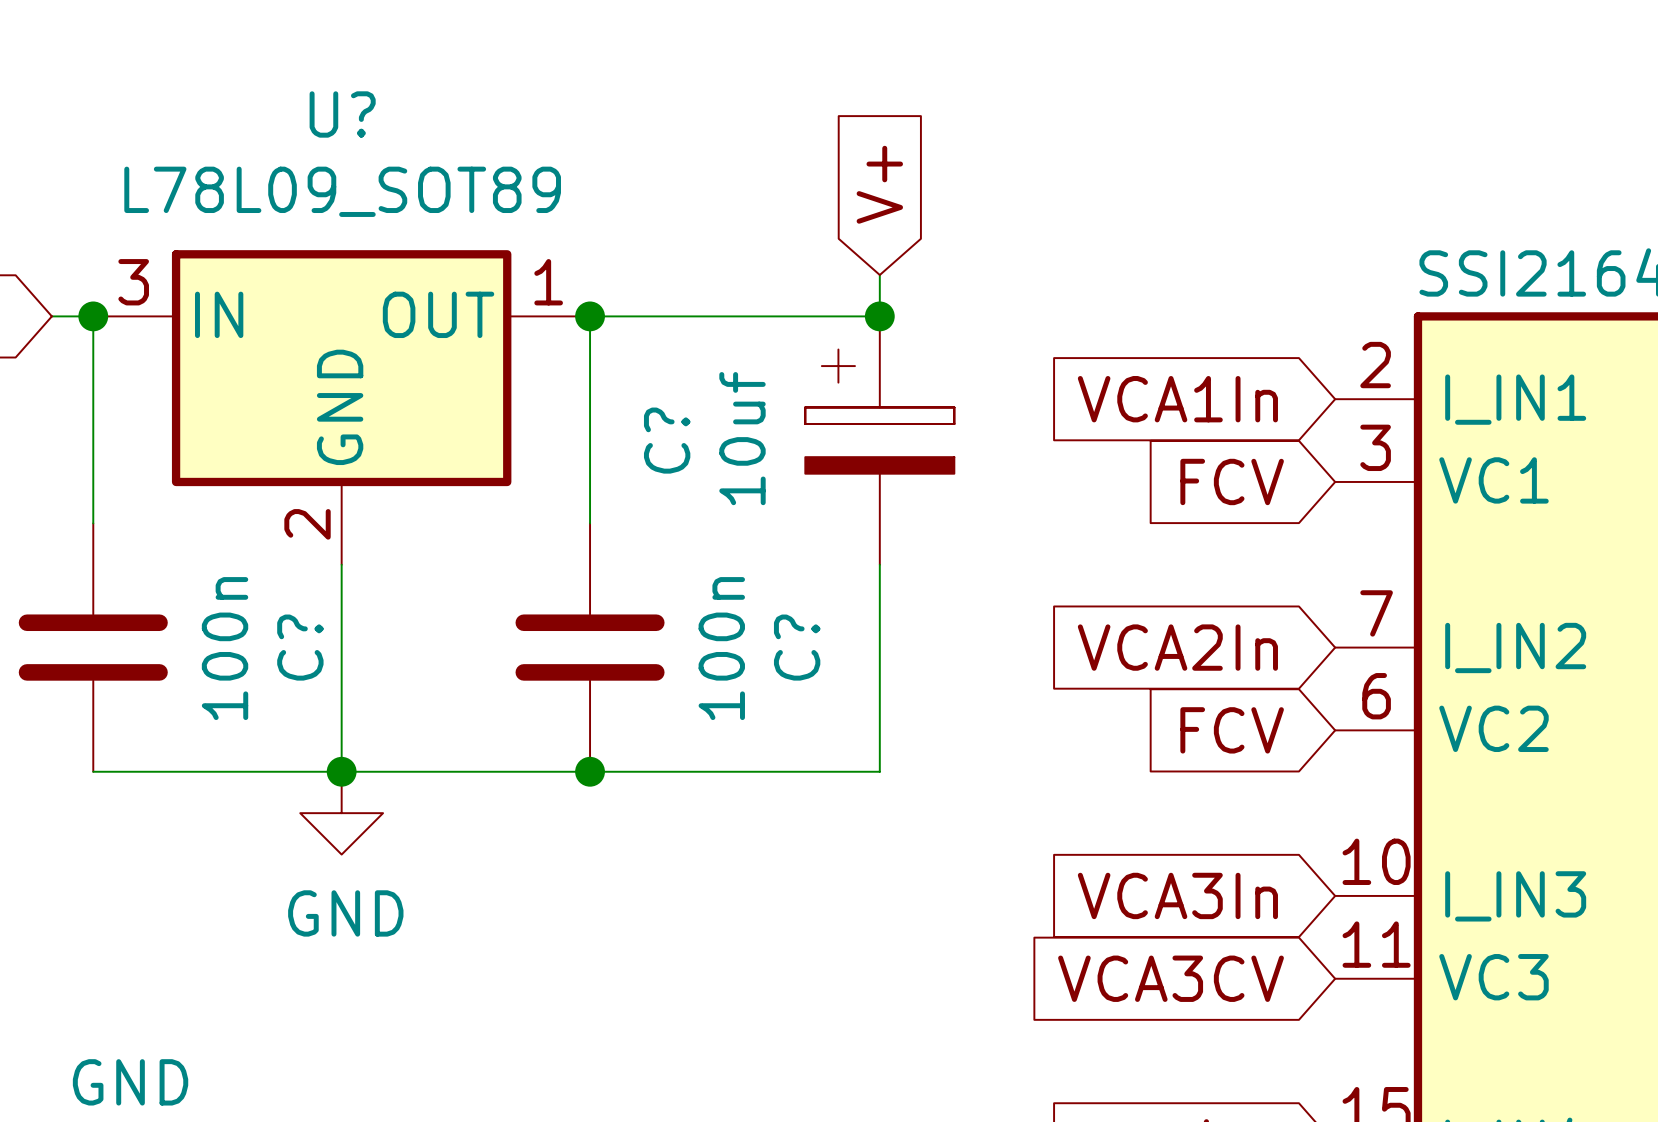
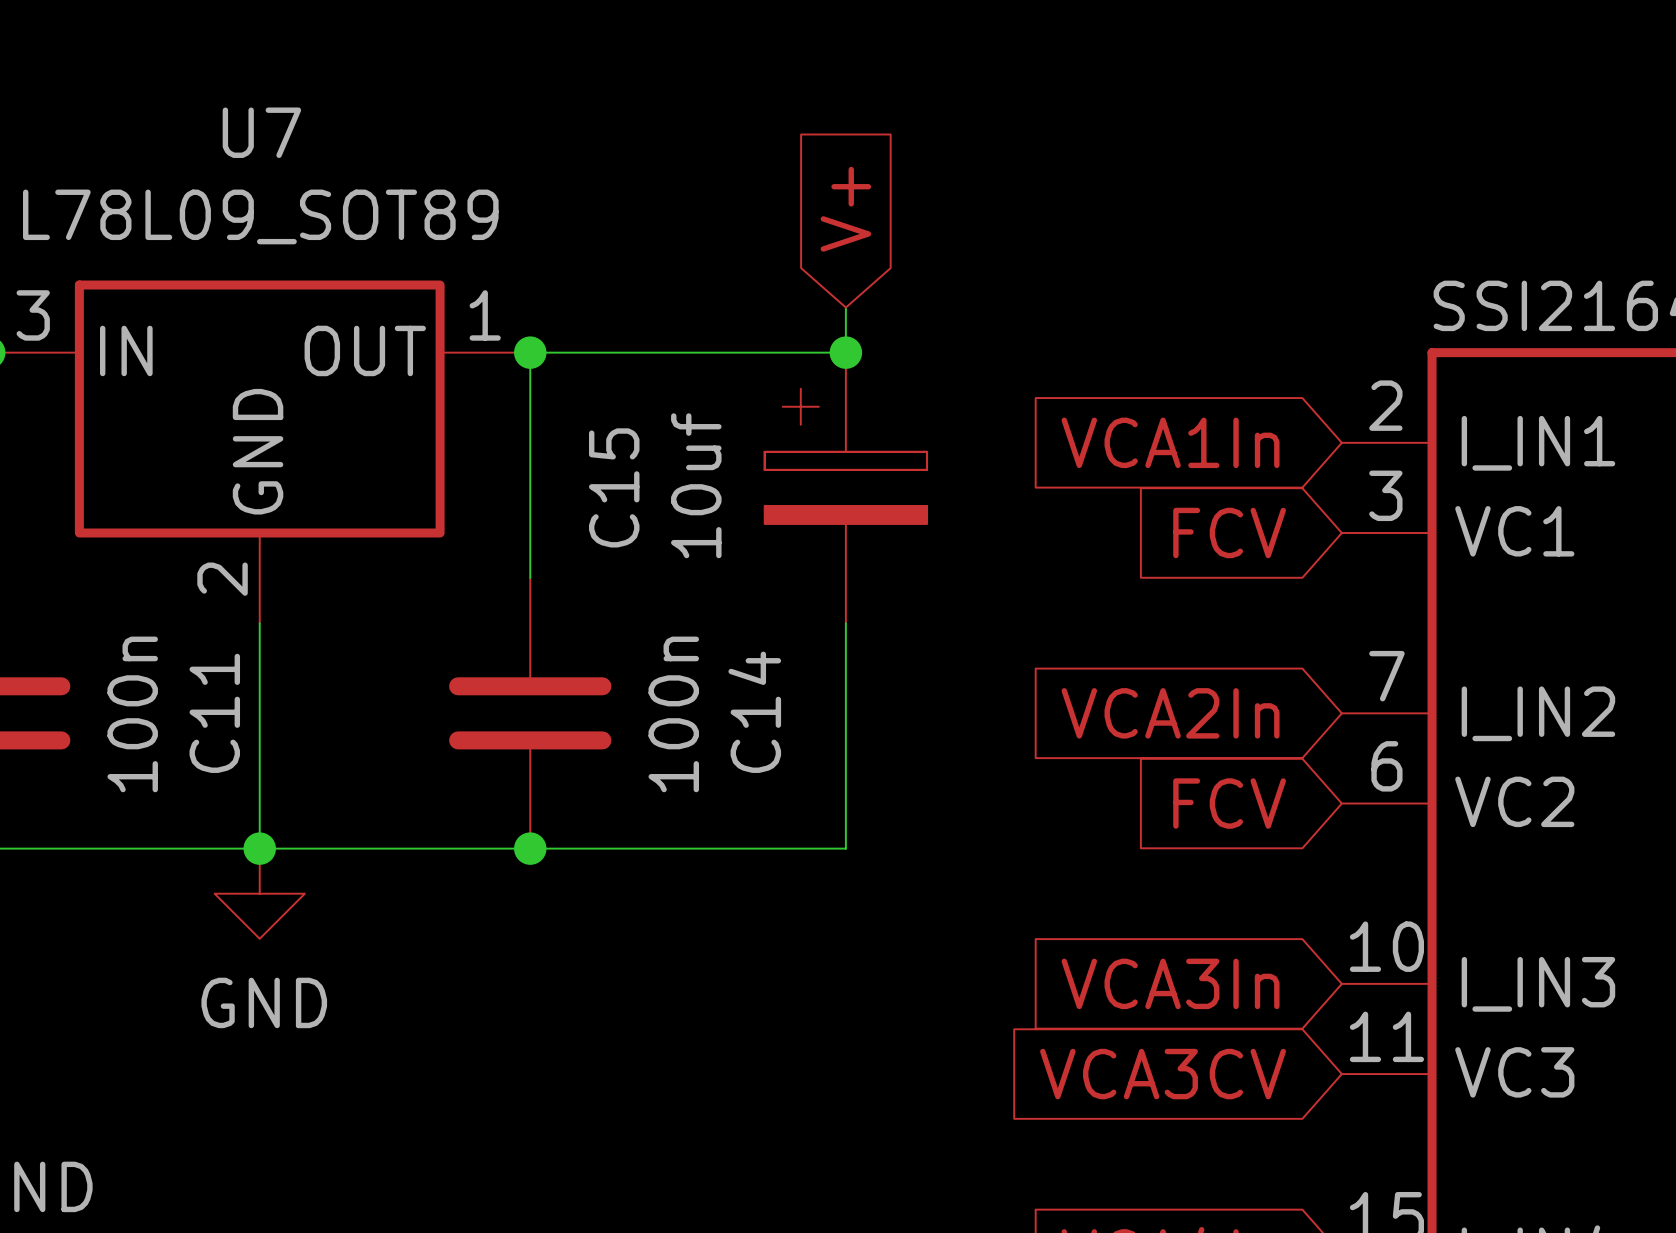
U? name: U? (342, 114) -> U7 (261, 132)
C? name: C? (667, 440) -> C15 (614, 487)
C? name: C? (300, 647) -> C11 (214, 713)
C? name: C? (797, 647) -> C14 (754, 712)

